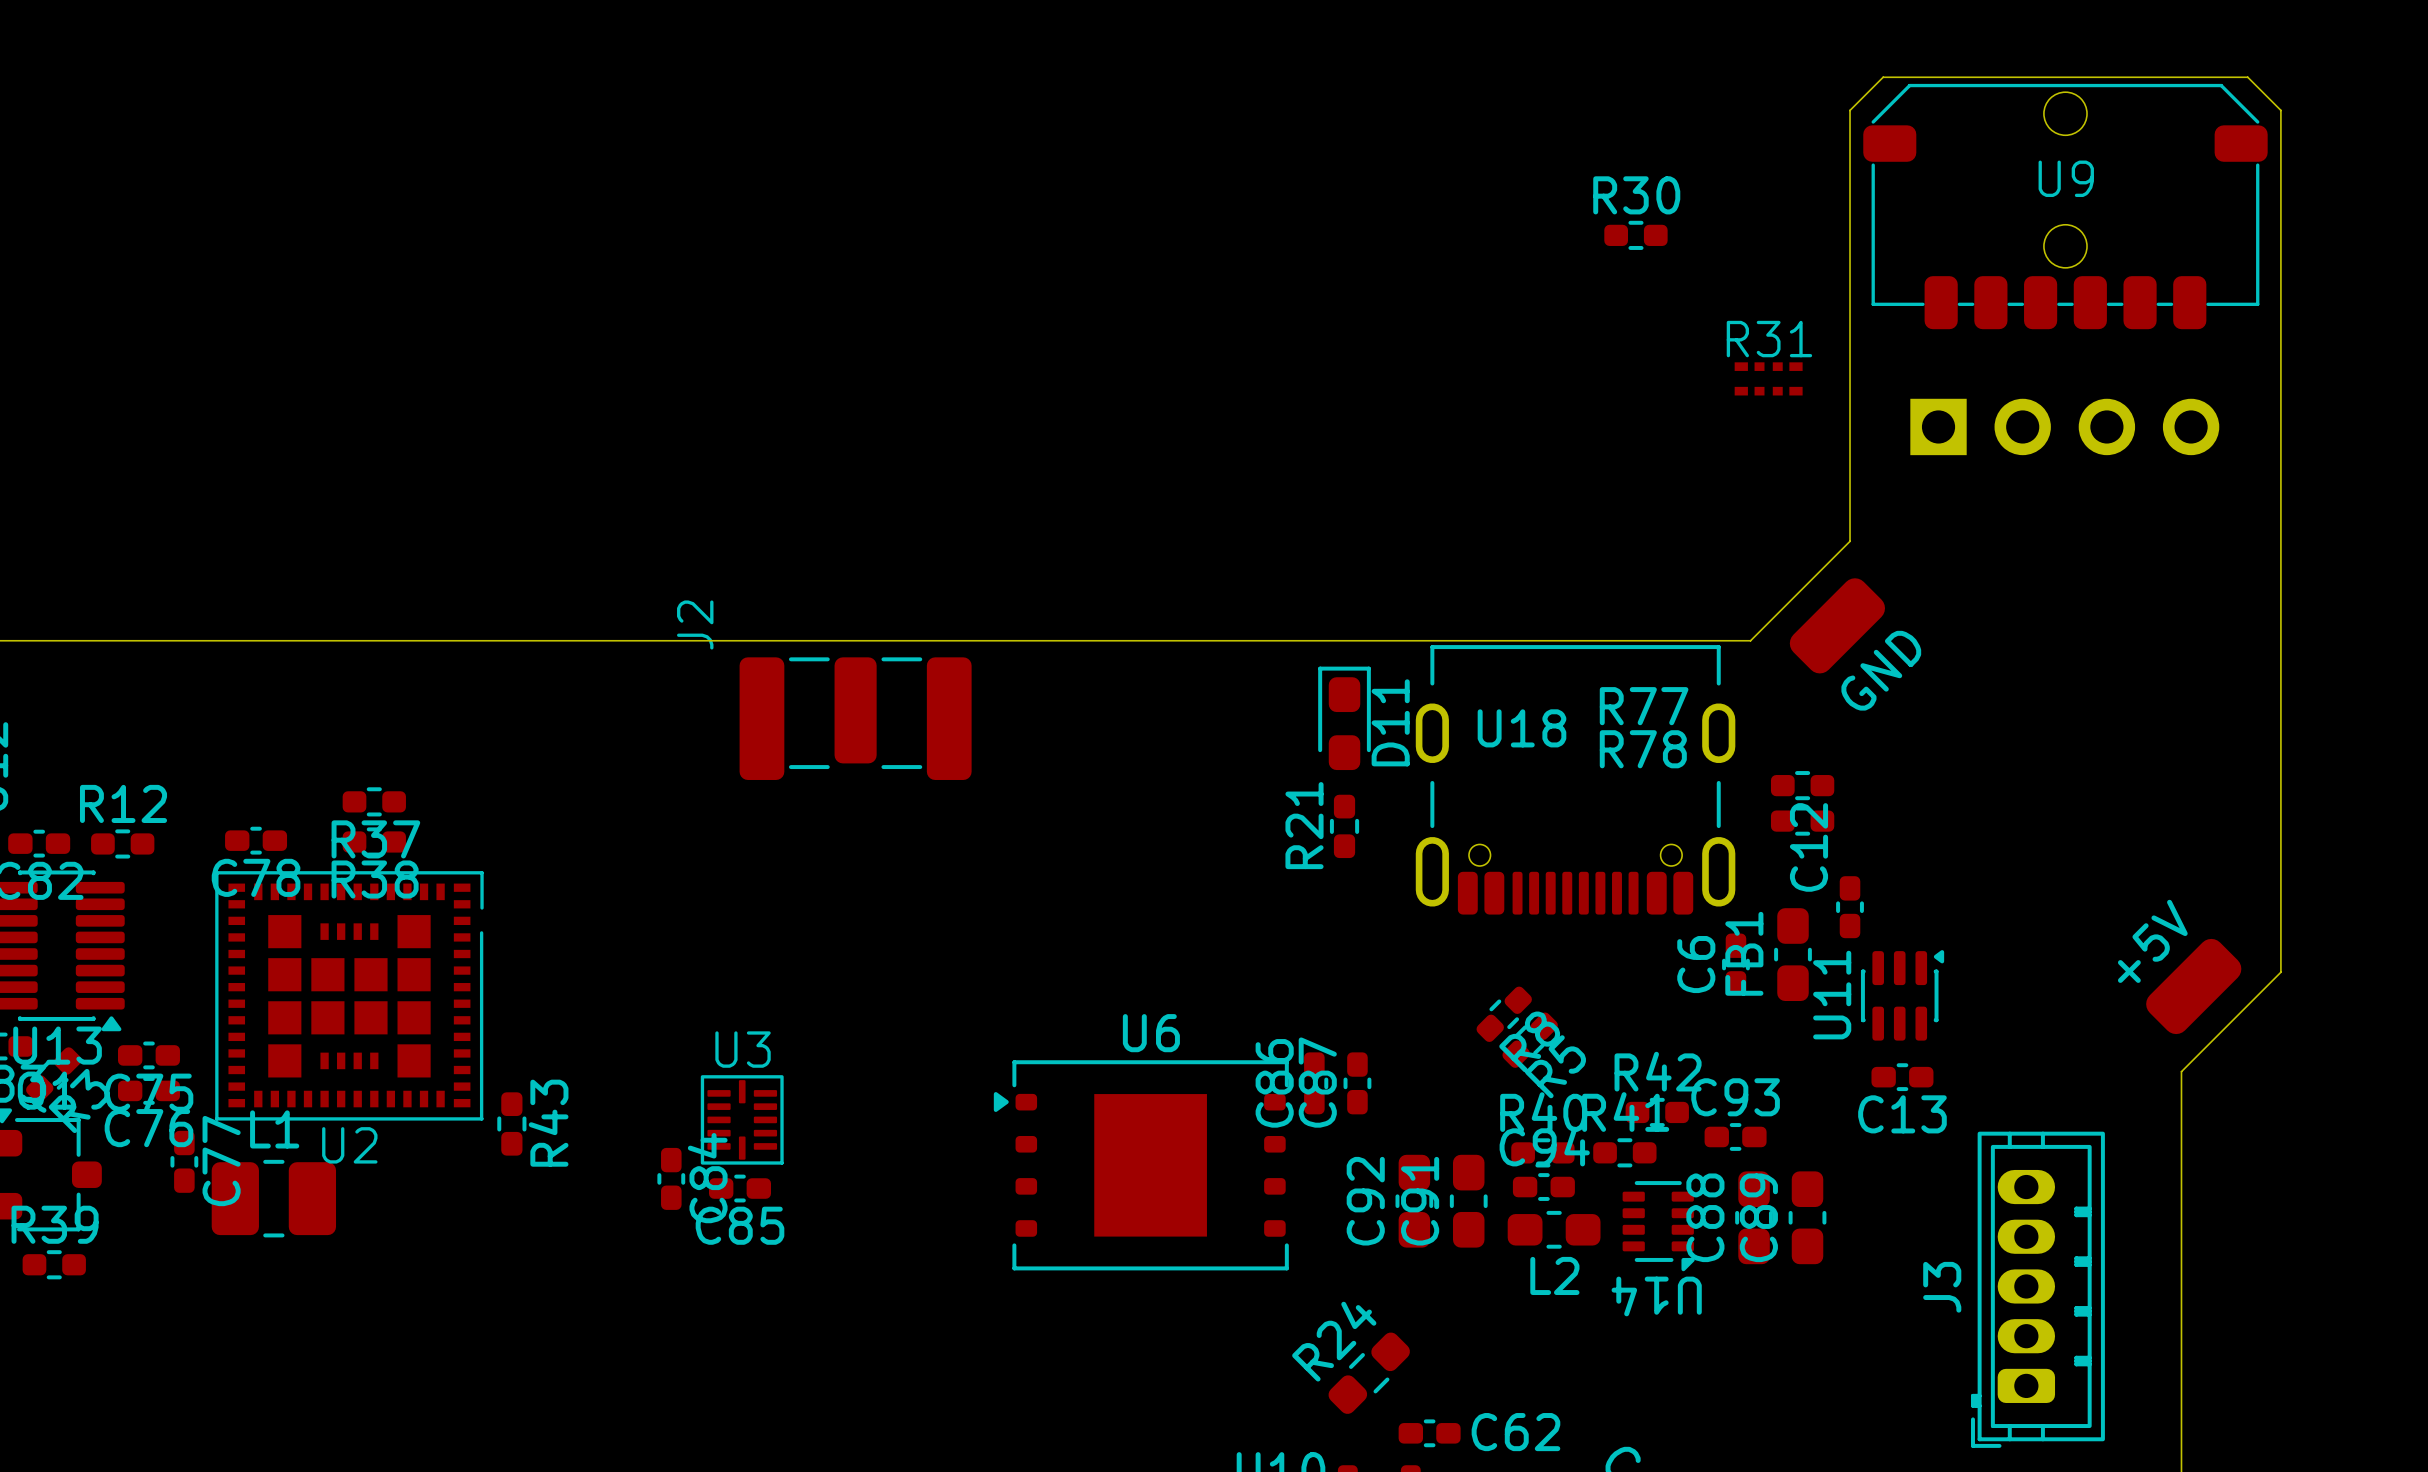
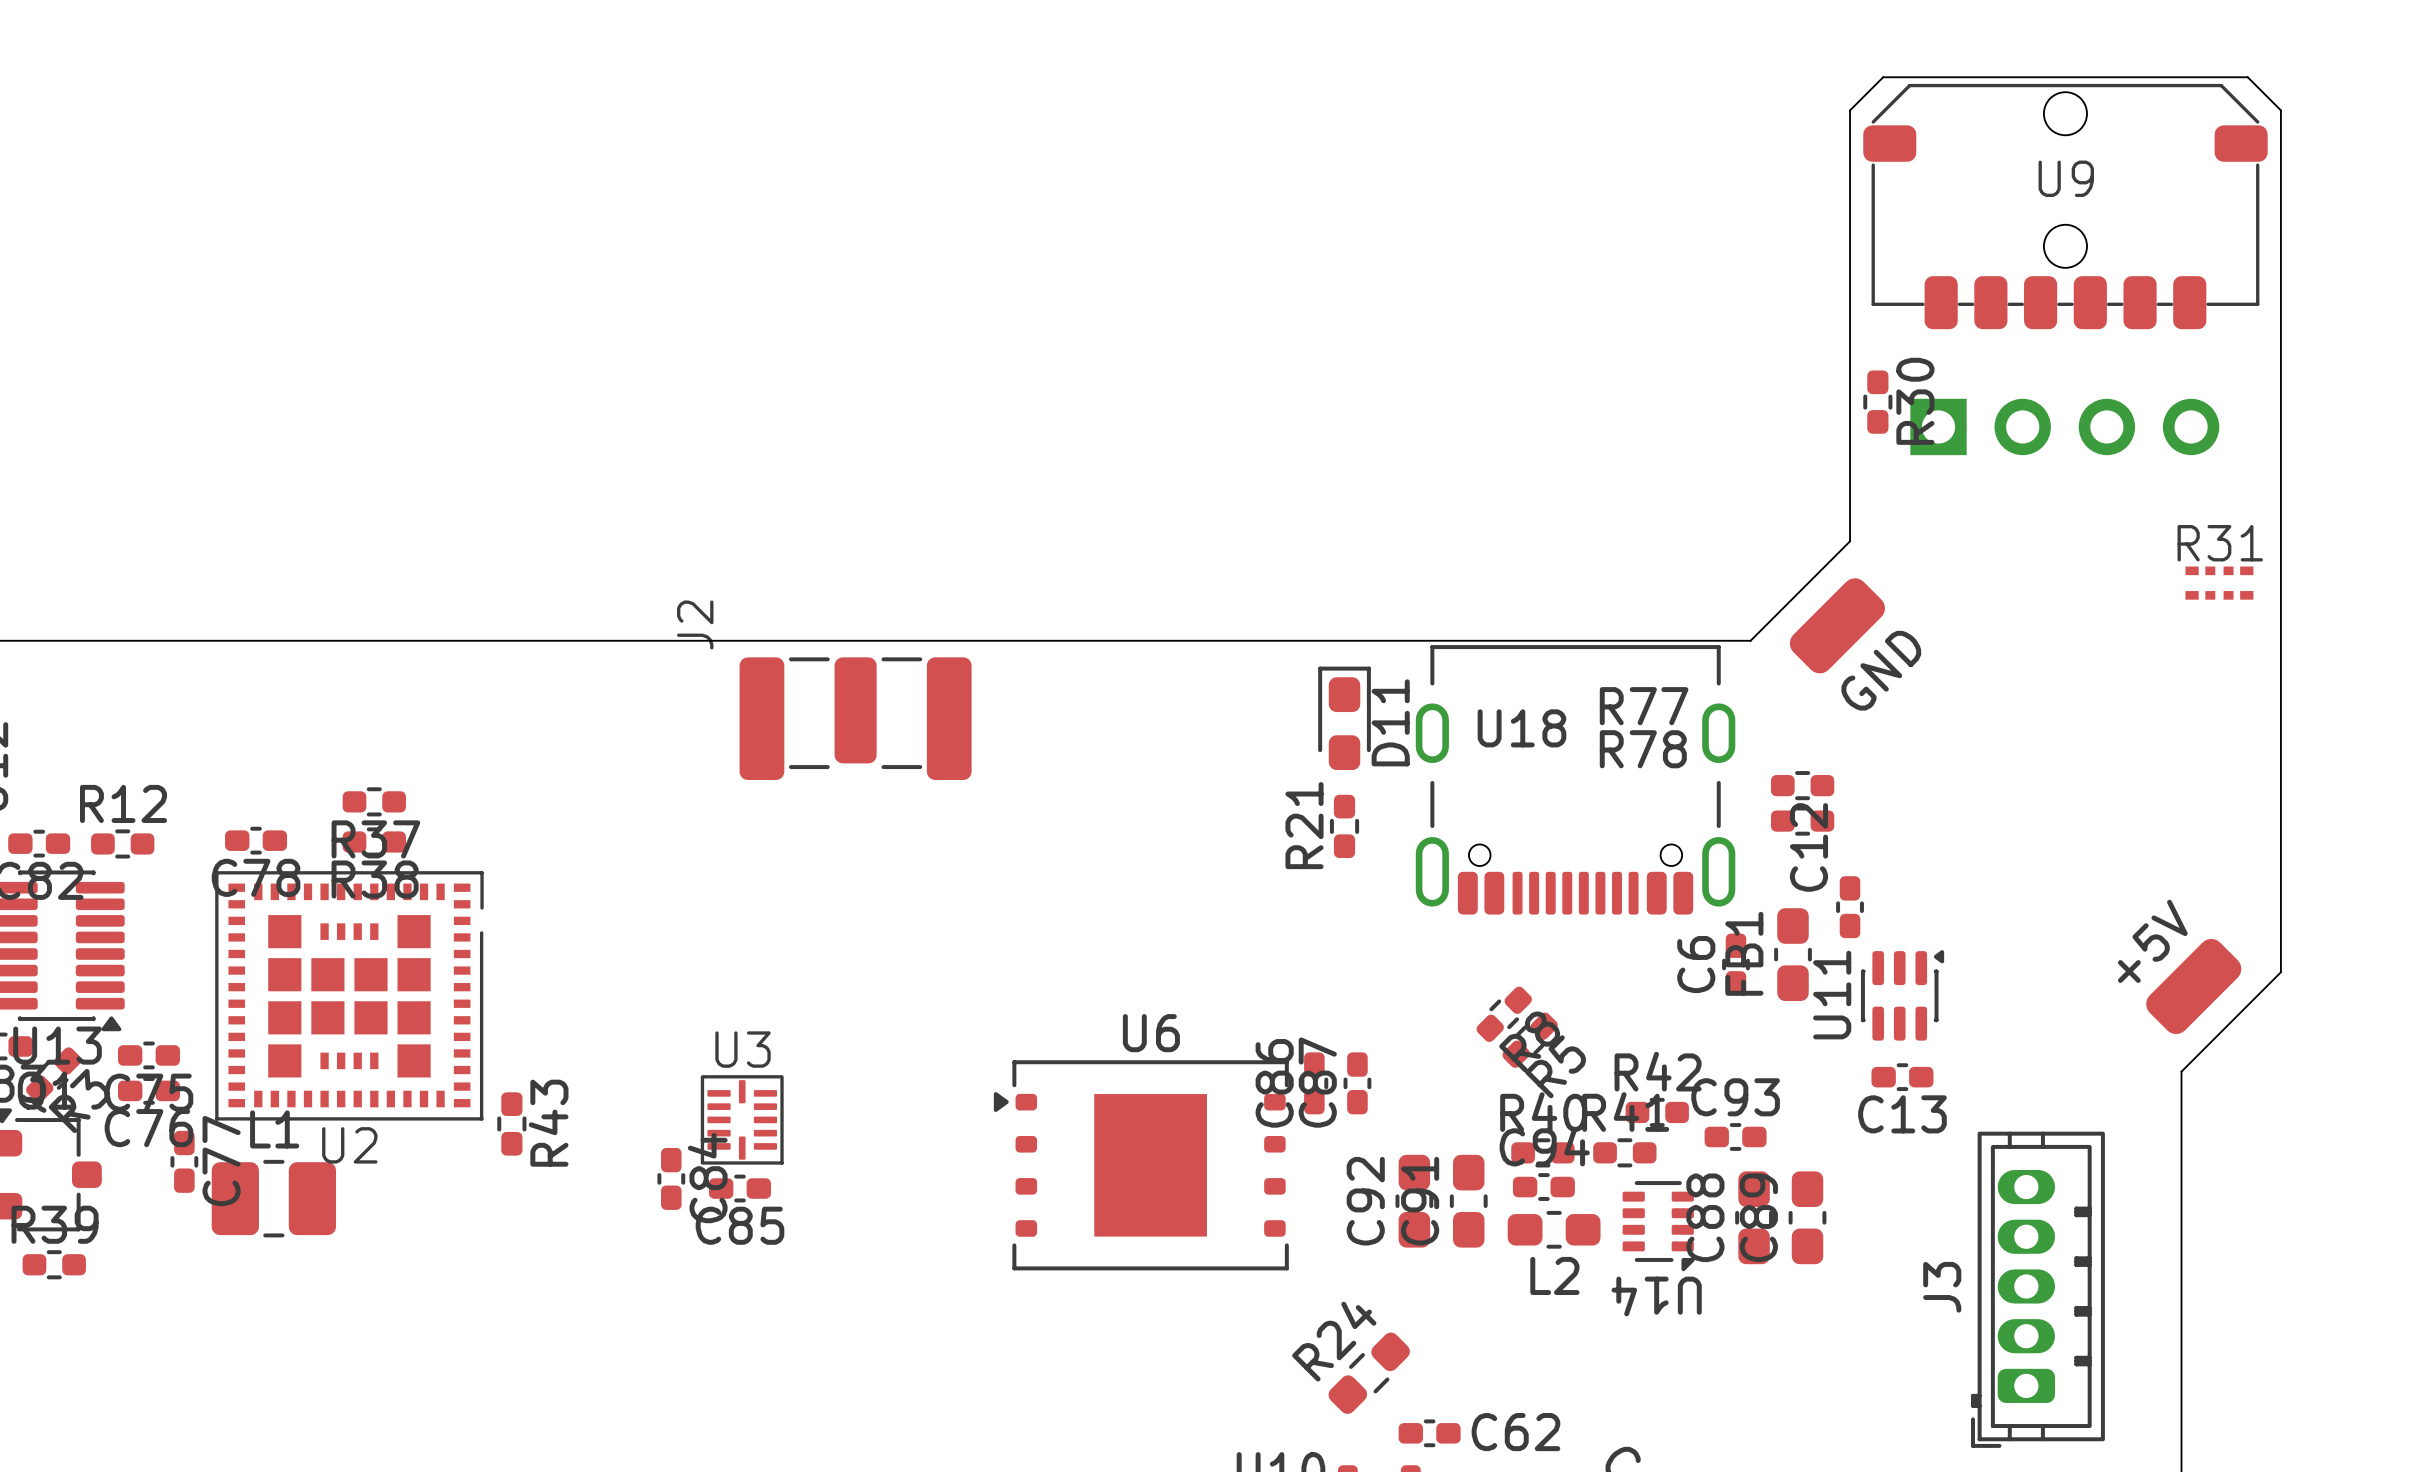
R30 rotation: 0° (1635, 235) -> 90° clockwise (1877, 402)
R30 position: (1635, 235) -> (1877, 402)
R31 position: (1768, 378) -> (2219, 583)

